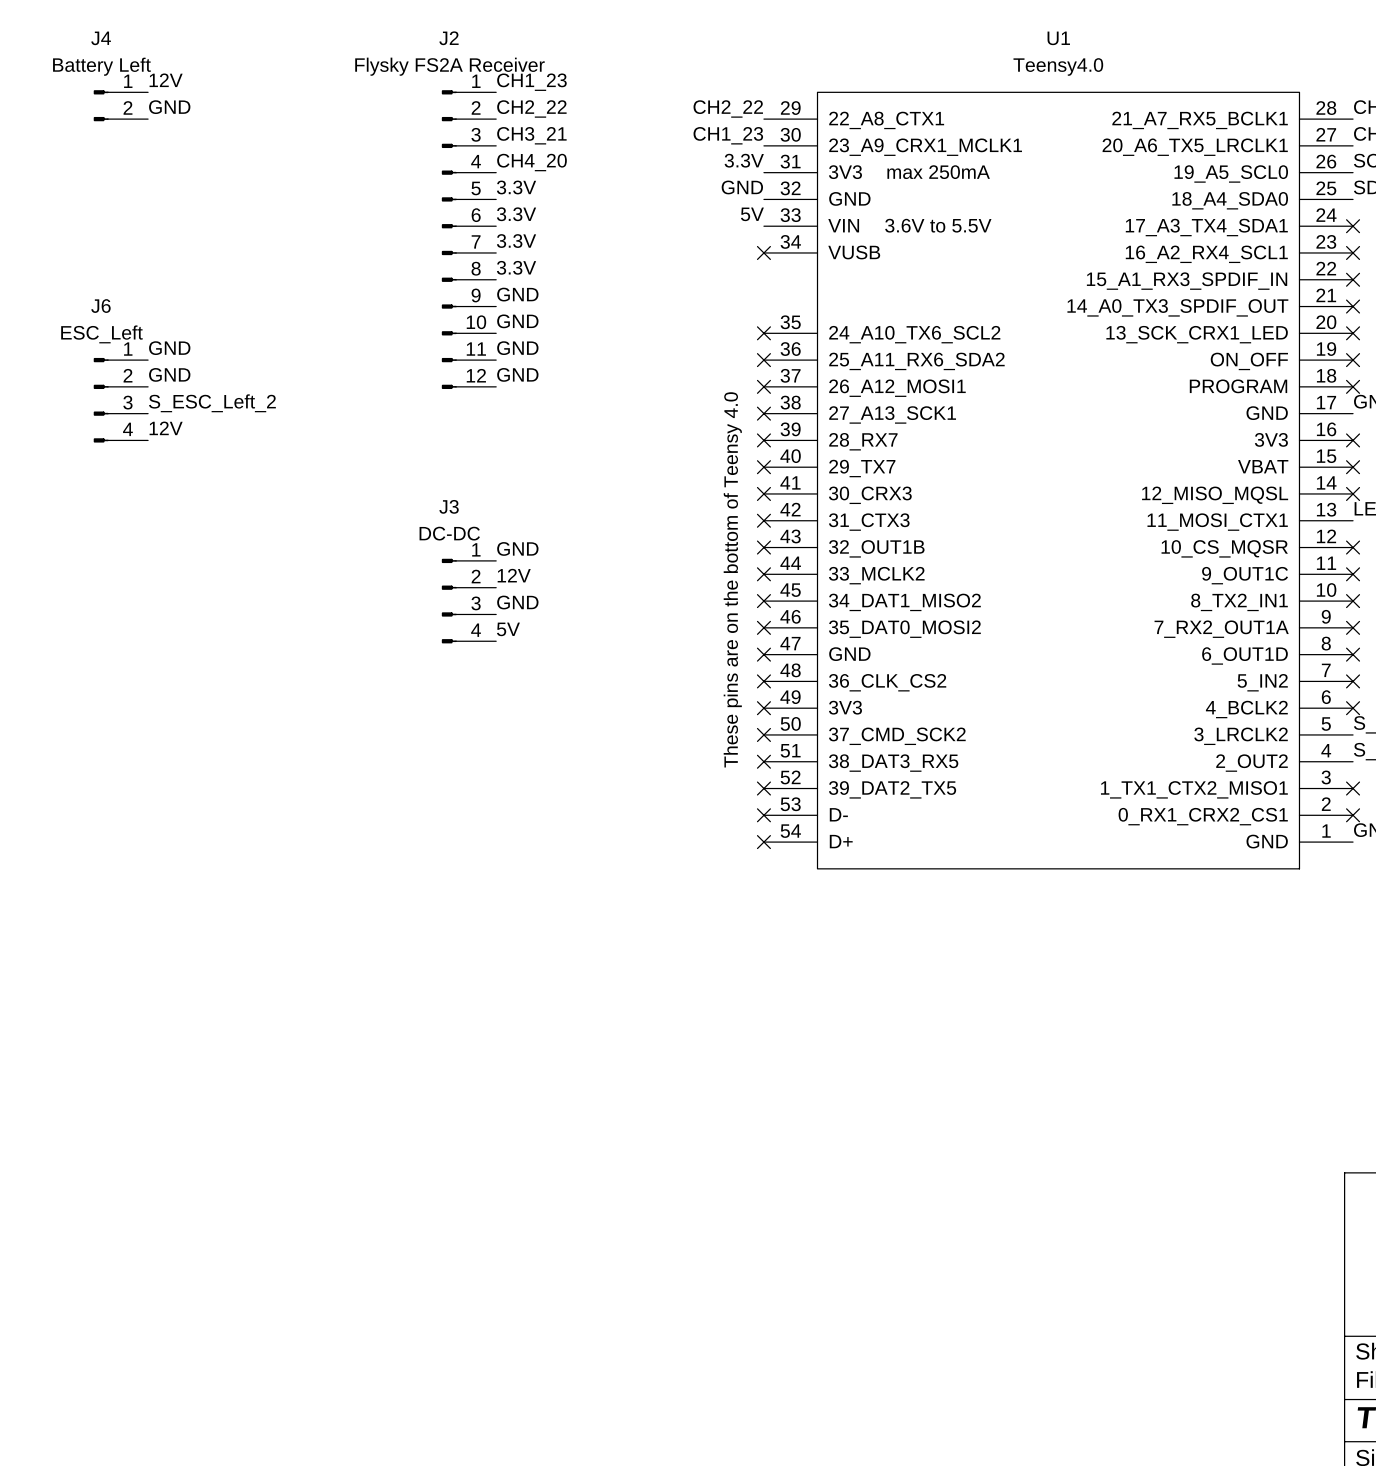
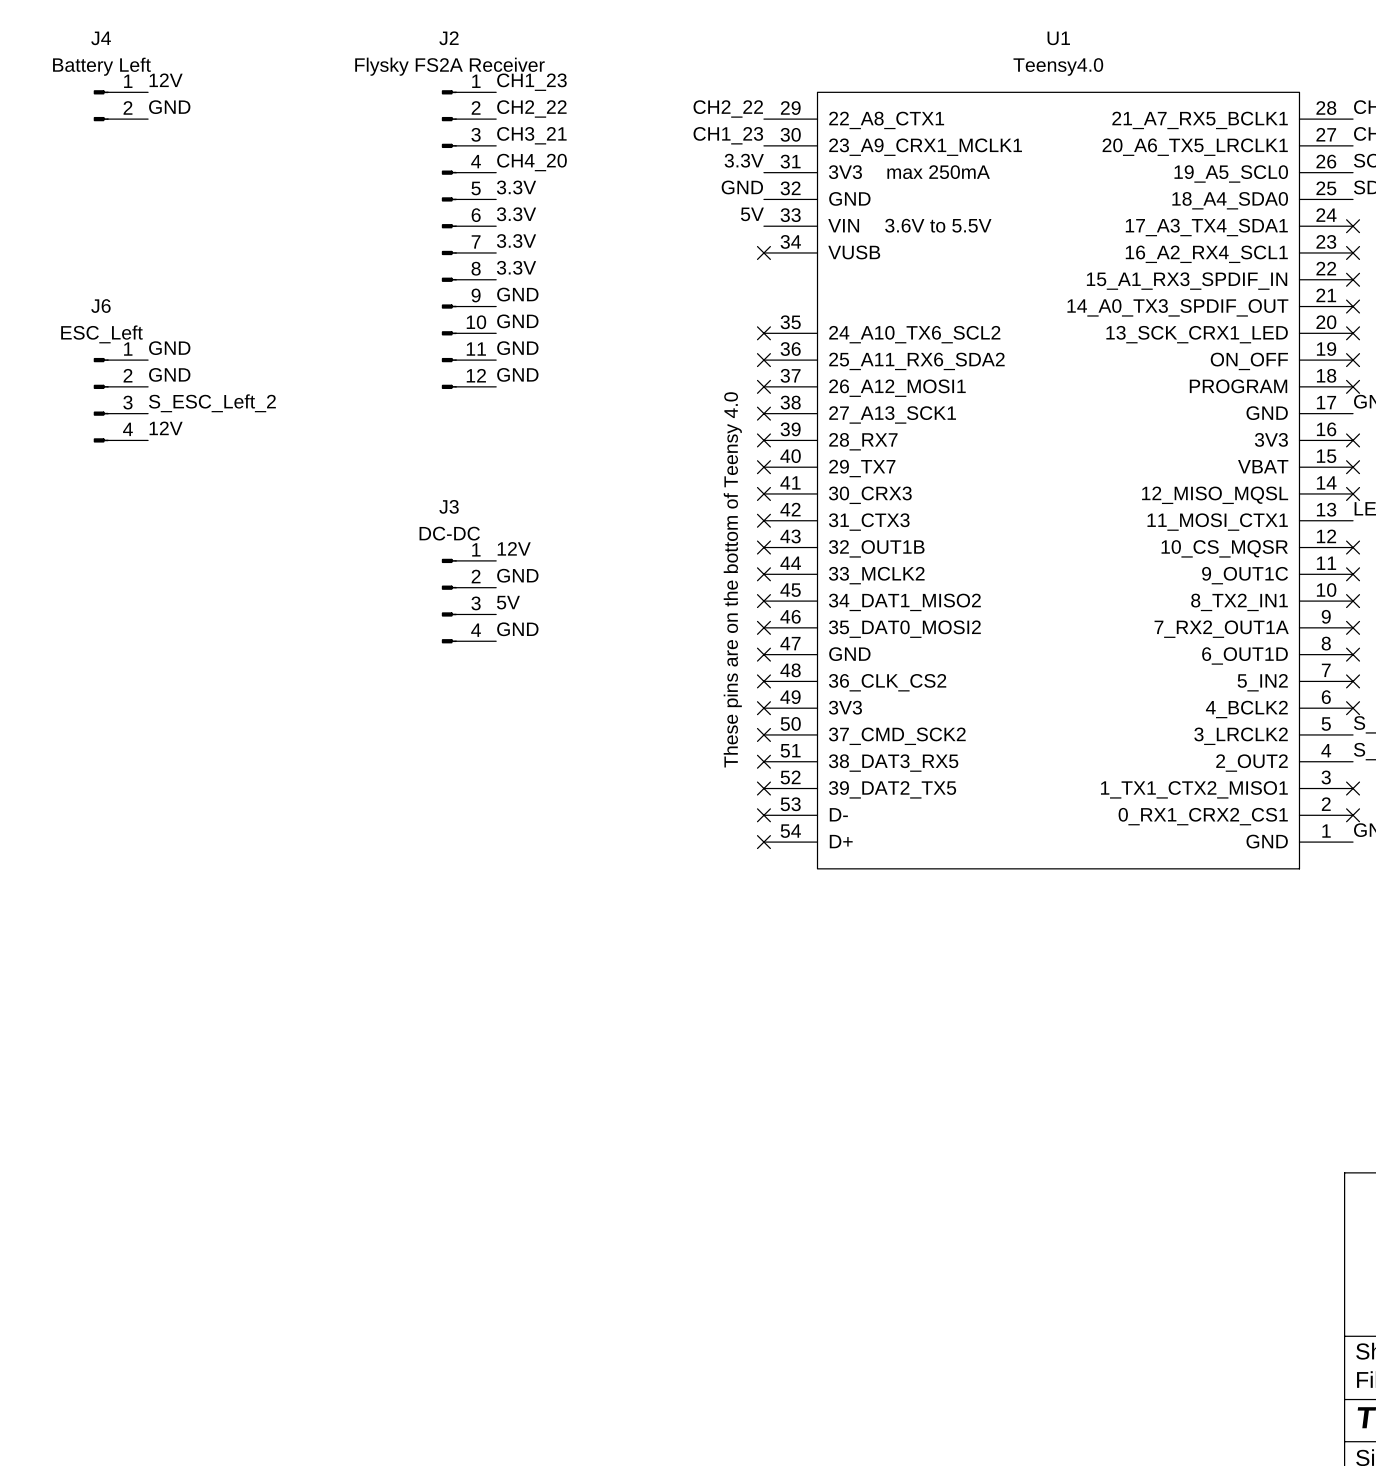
label: GND (517, 548) -> 12V (514, 548)
label: 12V (514, 575) -> GND (517, 575)
label: GND (517, 602) -> 5V (508, 602)
label: 5V (508, 629) -> GND (517, 629)

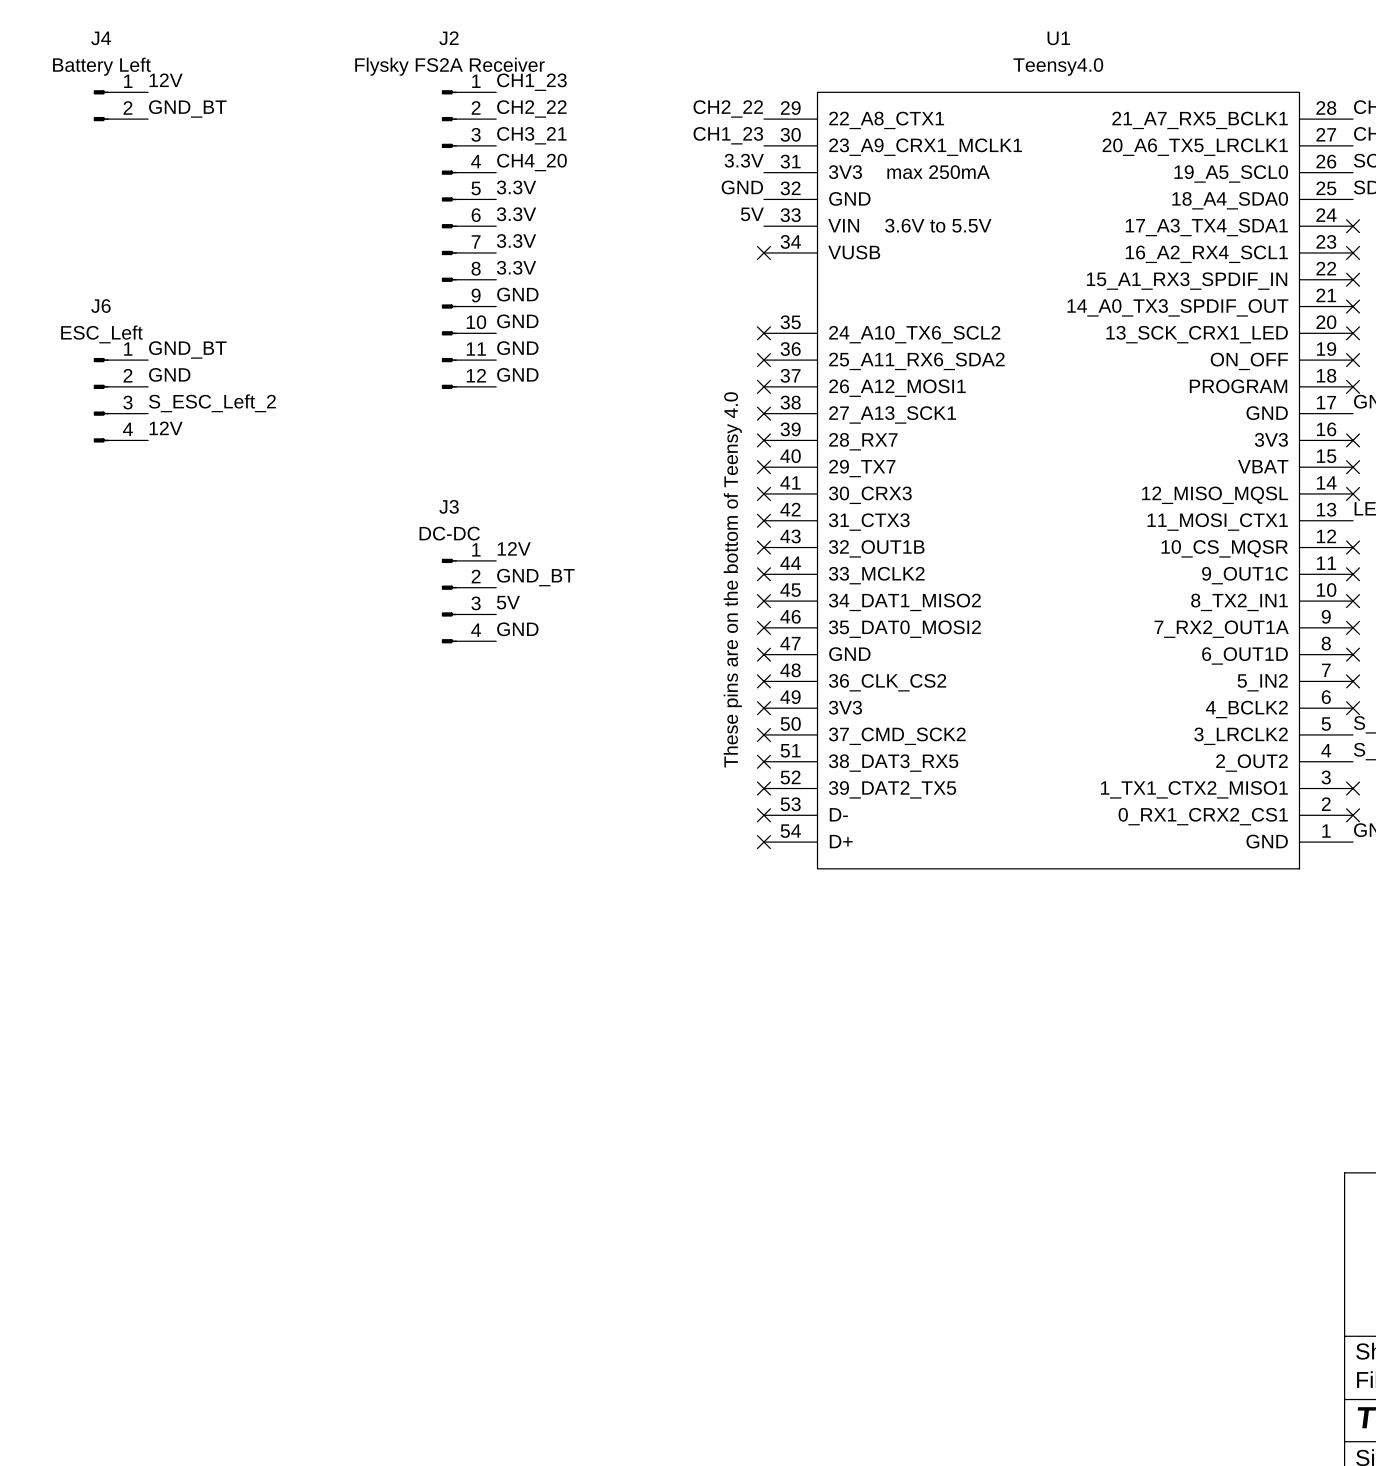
label: GND (169, 107) -> GND_BT (187, 108)
label: GND (169, 348) -> GND_BT (187, 349)
label: GND (517, 575) -> GND_BT (535, 577)

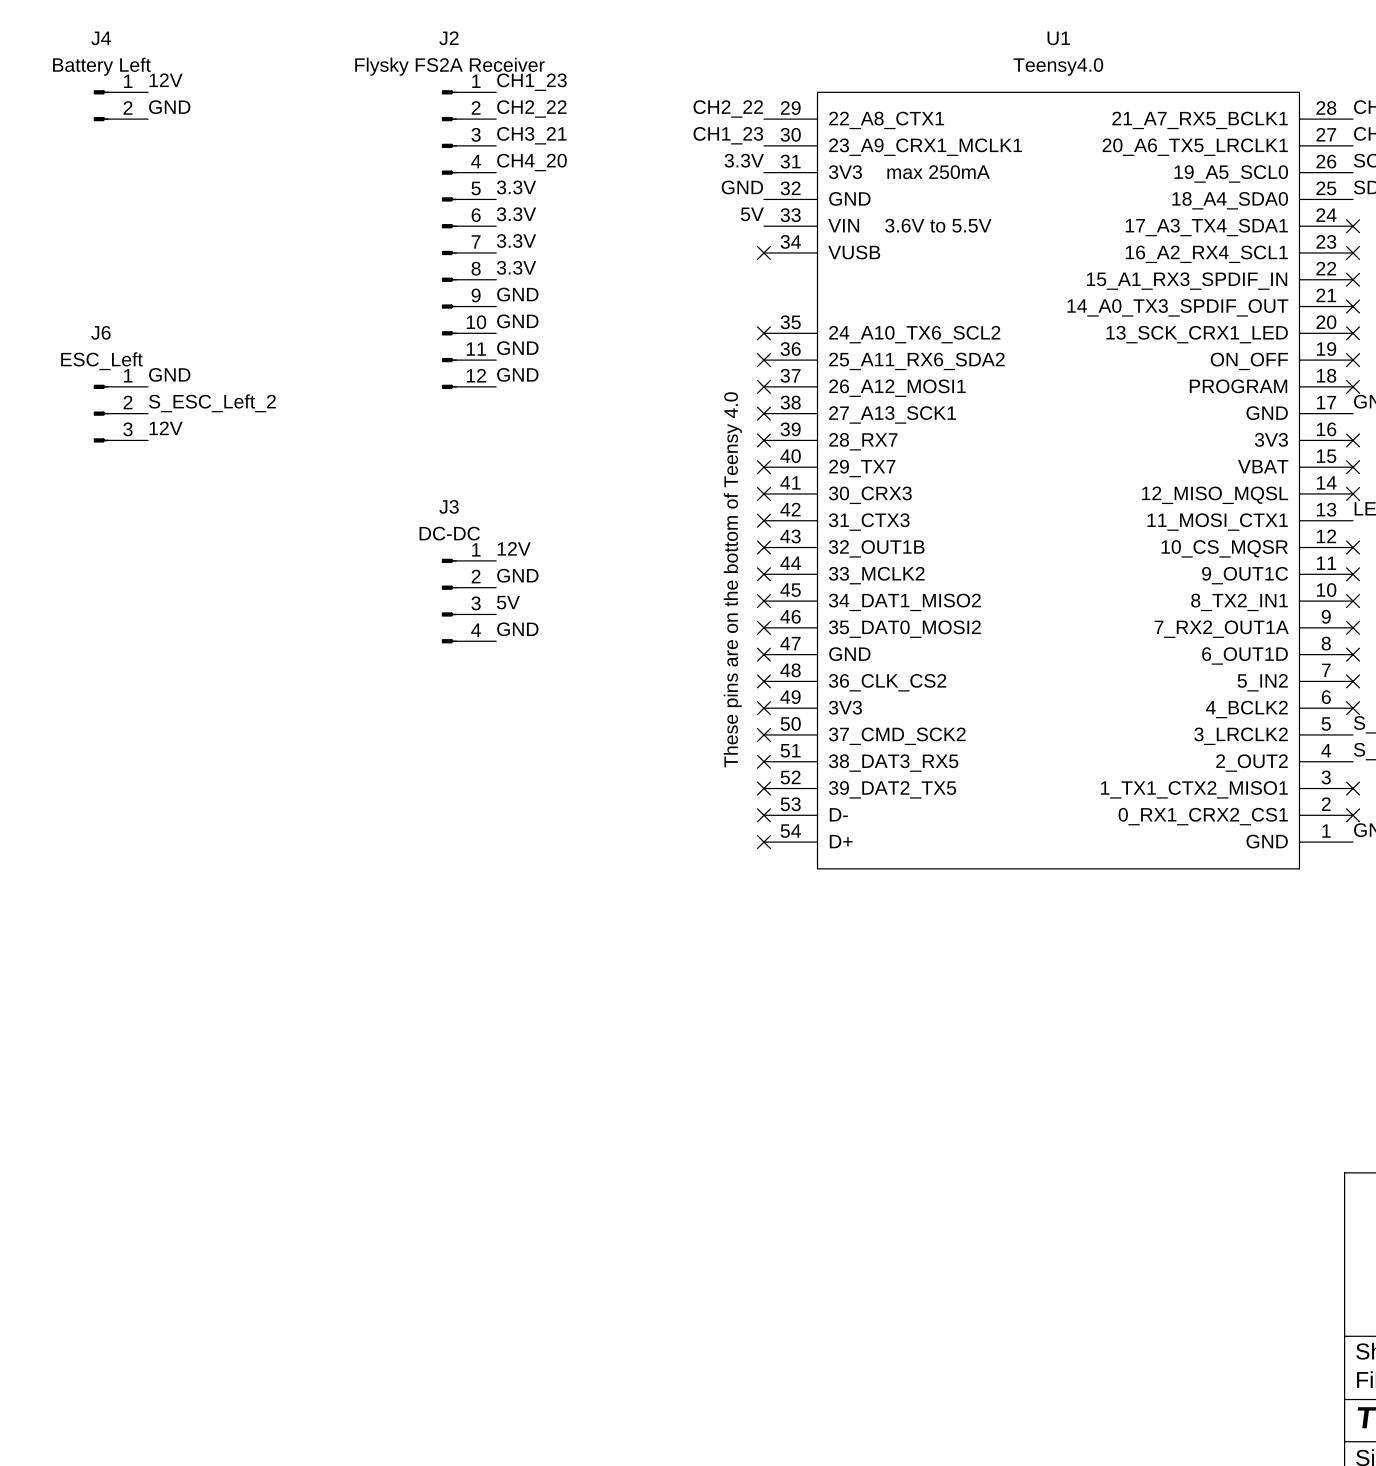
label: GND_BT (187, 108) -> GND (169, 107)
label: GND_BT (187, 349) -> none
J6 symbol: [93, 357, 149, 443] -> [93, 384, 149, 443]
label: GND_BT (535, 577) -> GND (517, 575)

